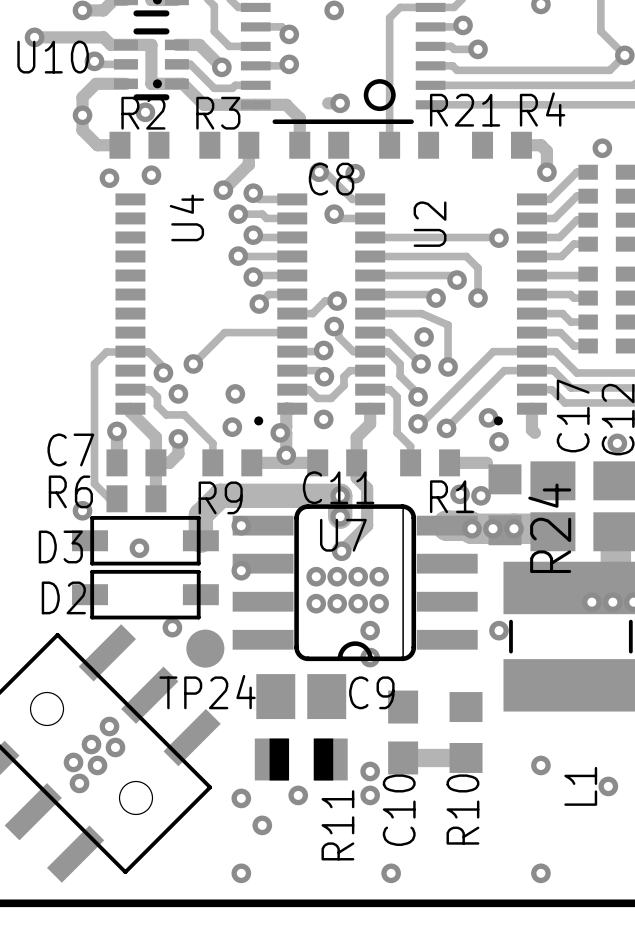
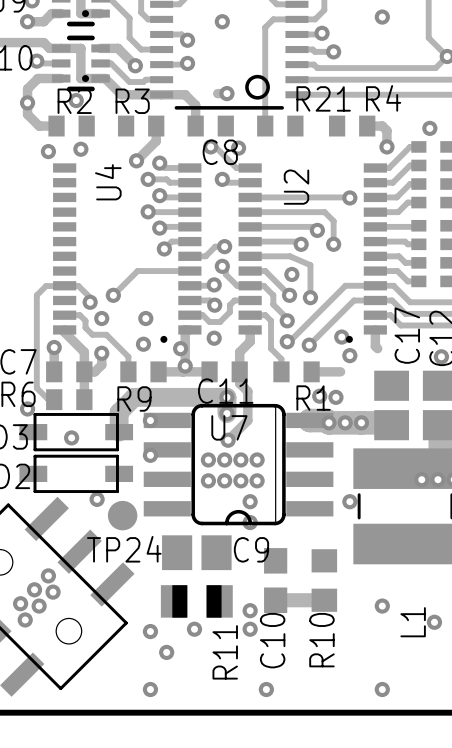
R24: (504, 504) -> none

